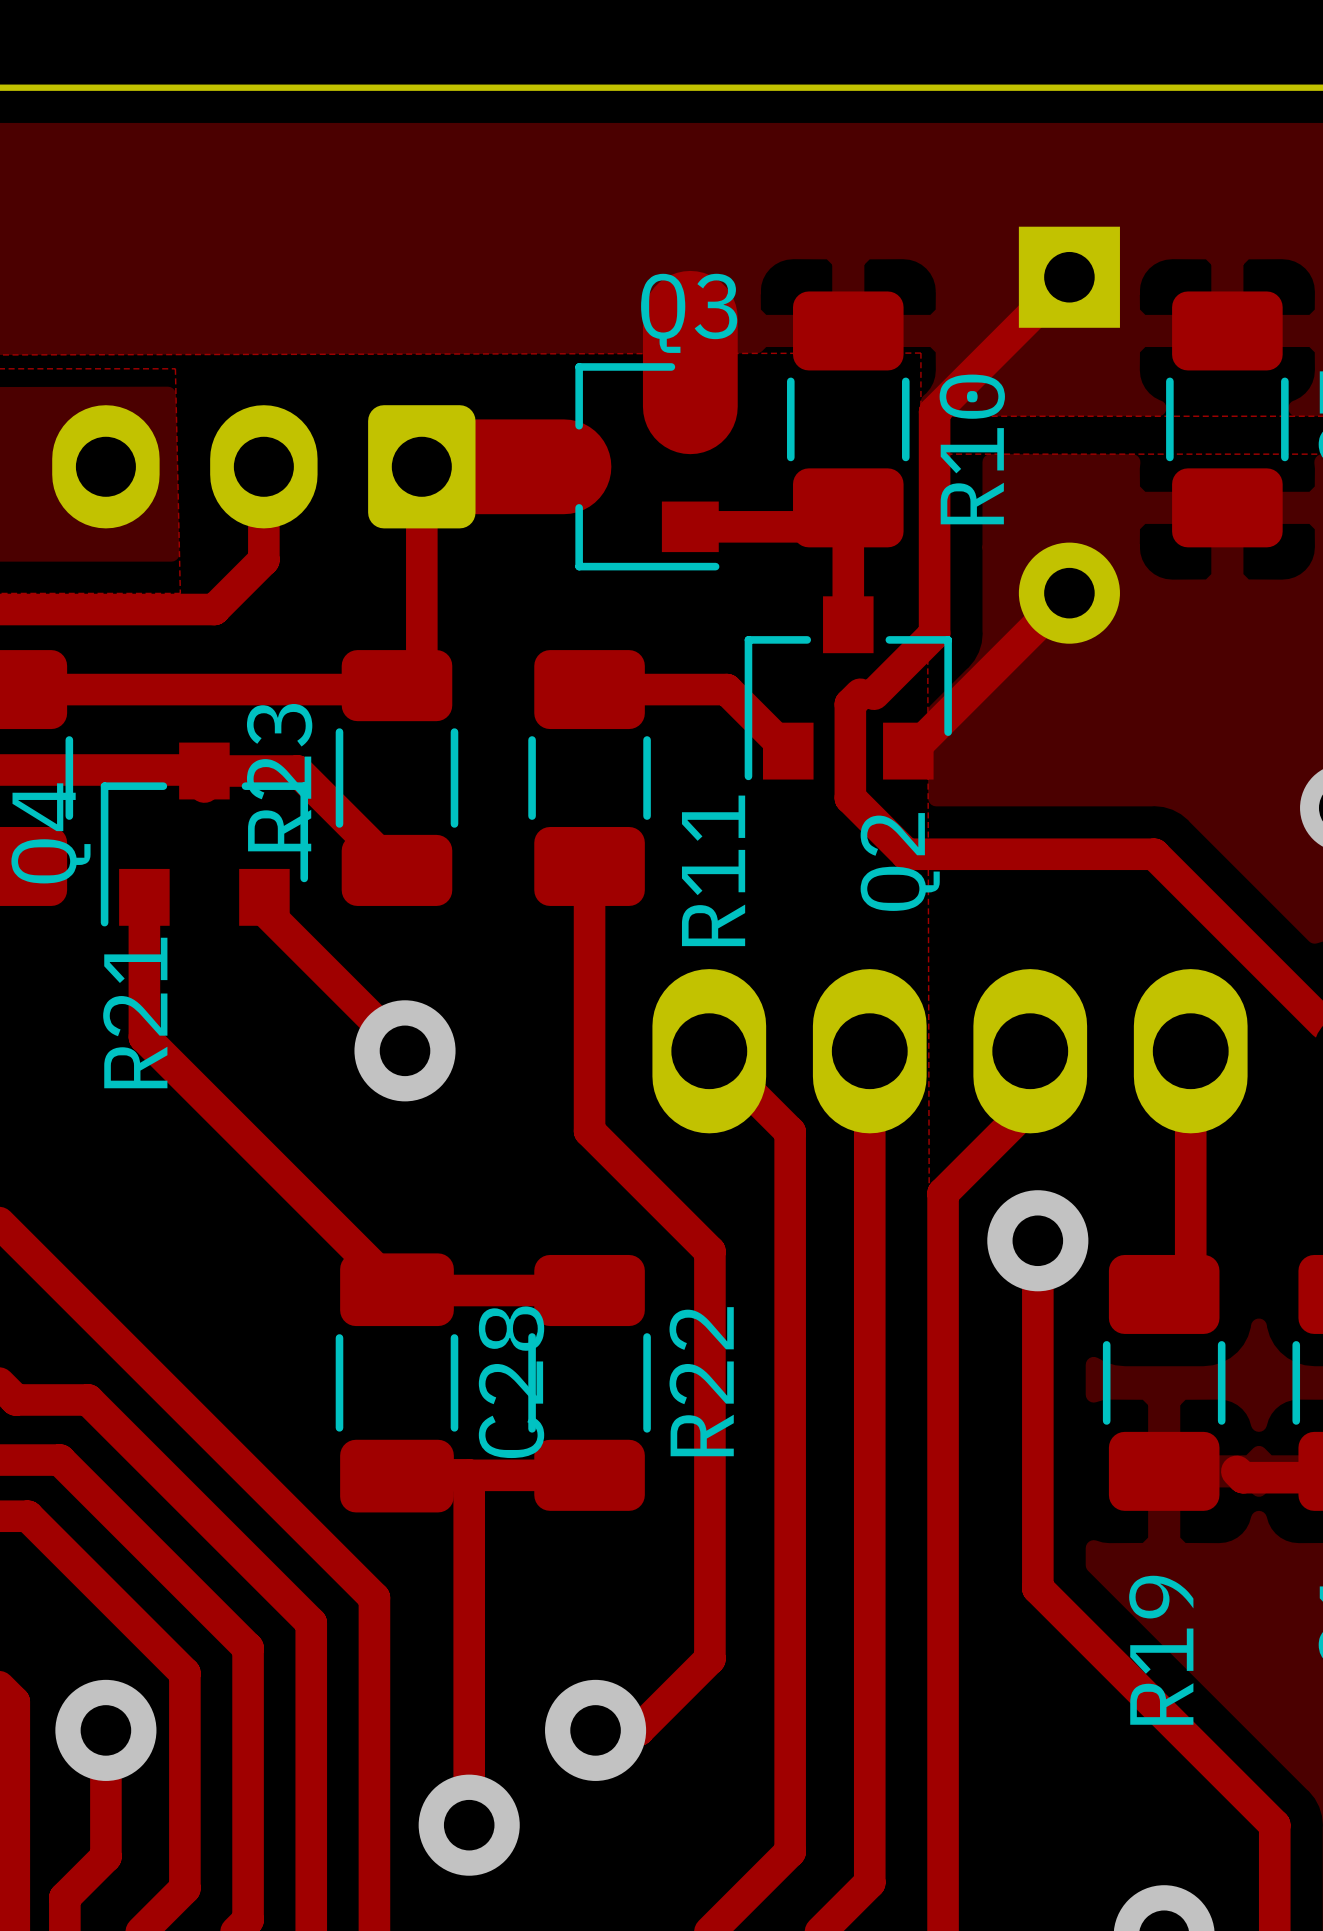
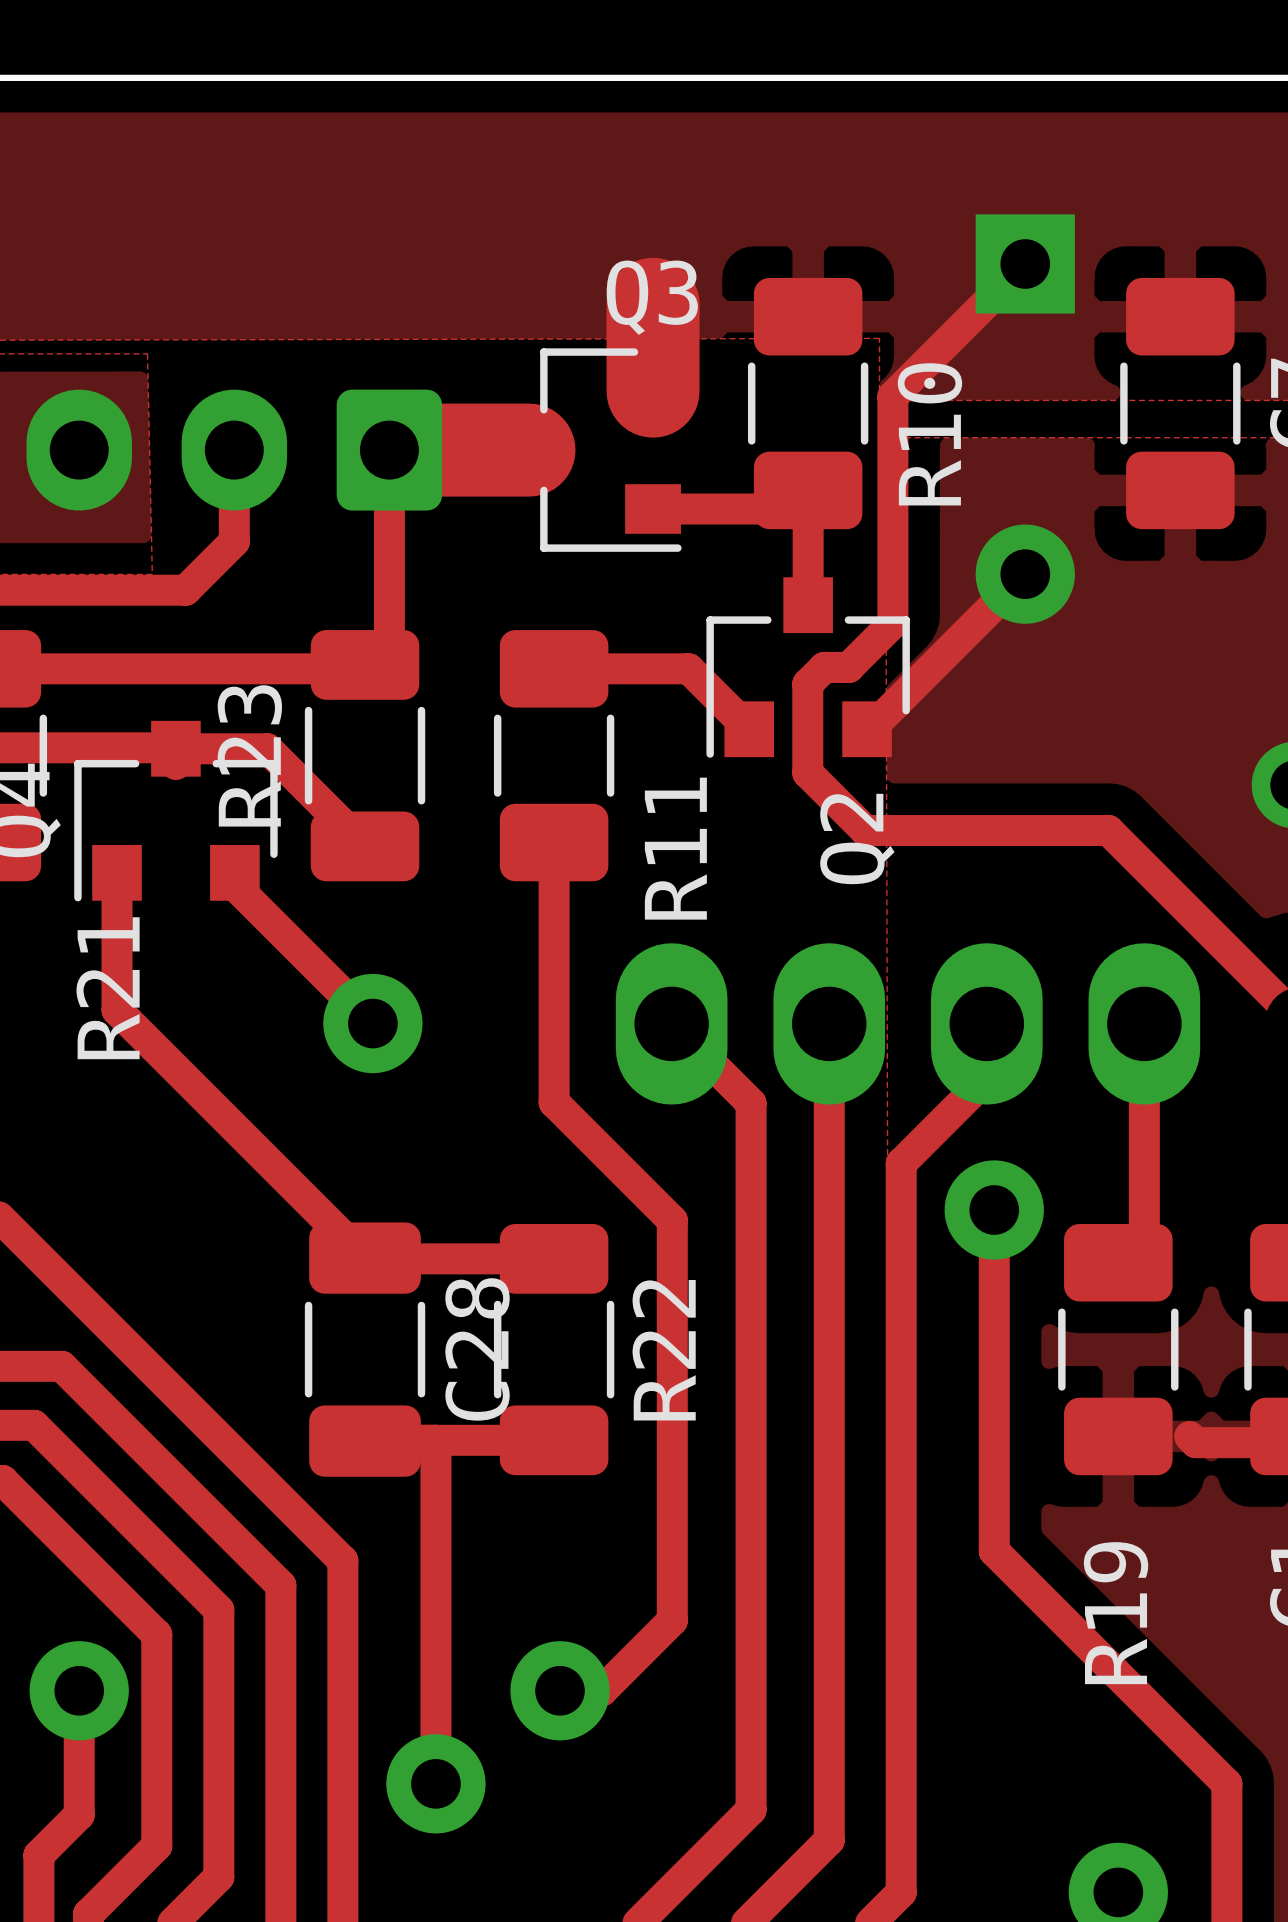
track: (934, 633) (873, 694) -> none
track: (860, 694) (850, 704) (850, 798) -> (892, 613) (892, 623) (848, 667) (824, 667) (807, 683) (807, 772) (810, 775)

